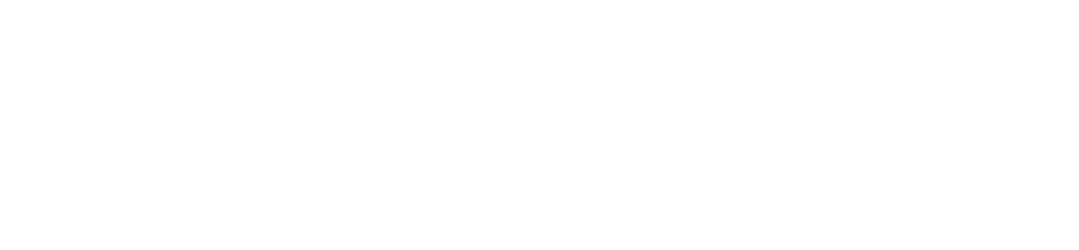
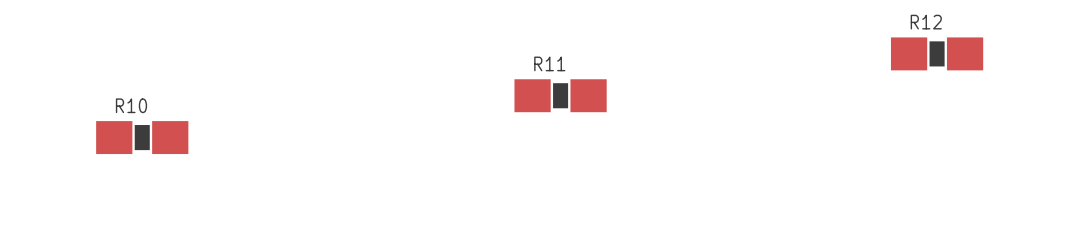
R12: none -> (937, 53)
R11: none -> (560, 95)
R10: none -> (142, 137)

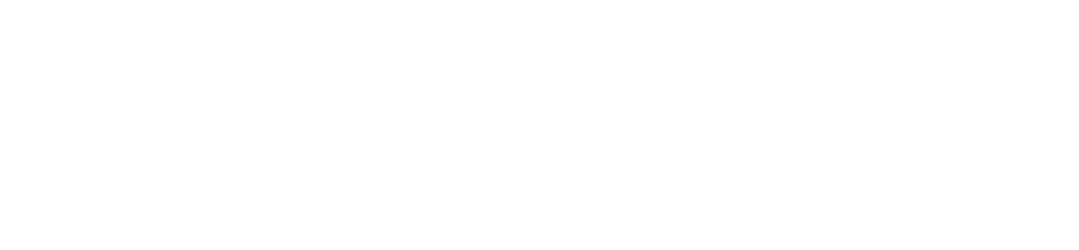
R12: (937, 53) -> none
R11: (560, 95) -> none
R10: (142, 137) -> none

